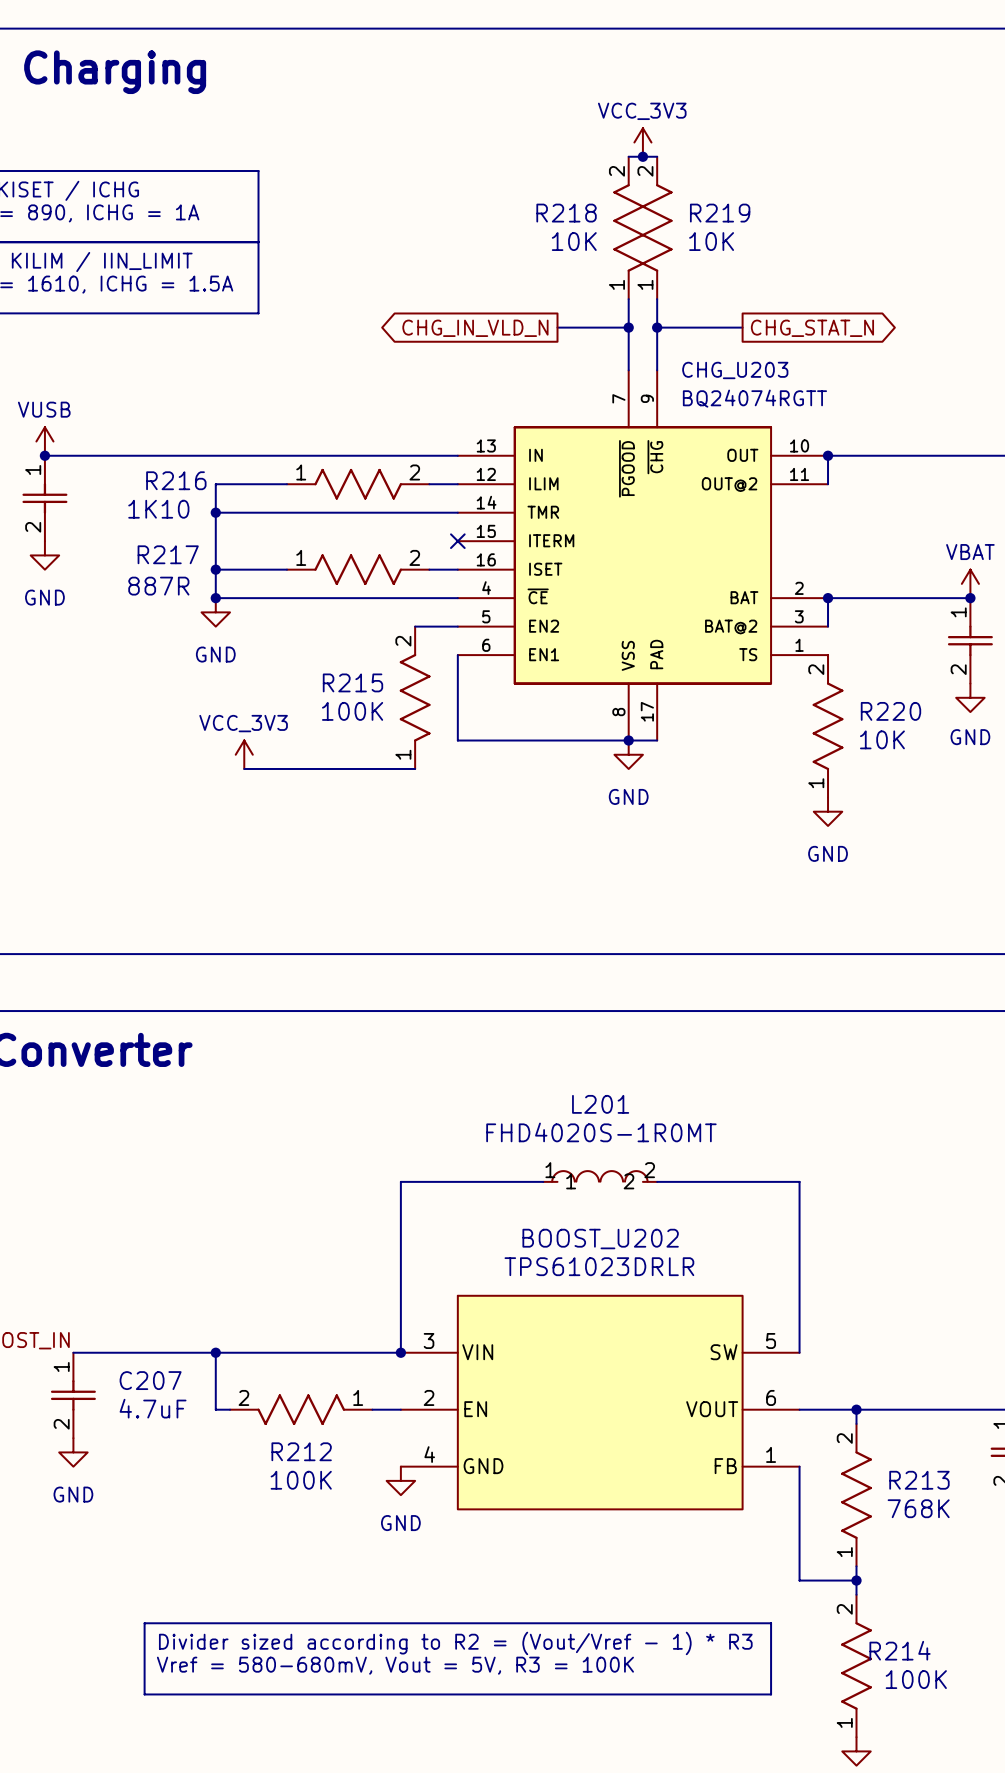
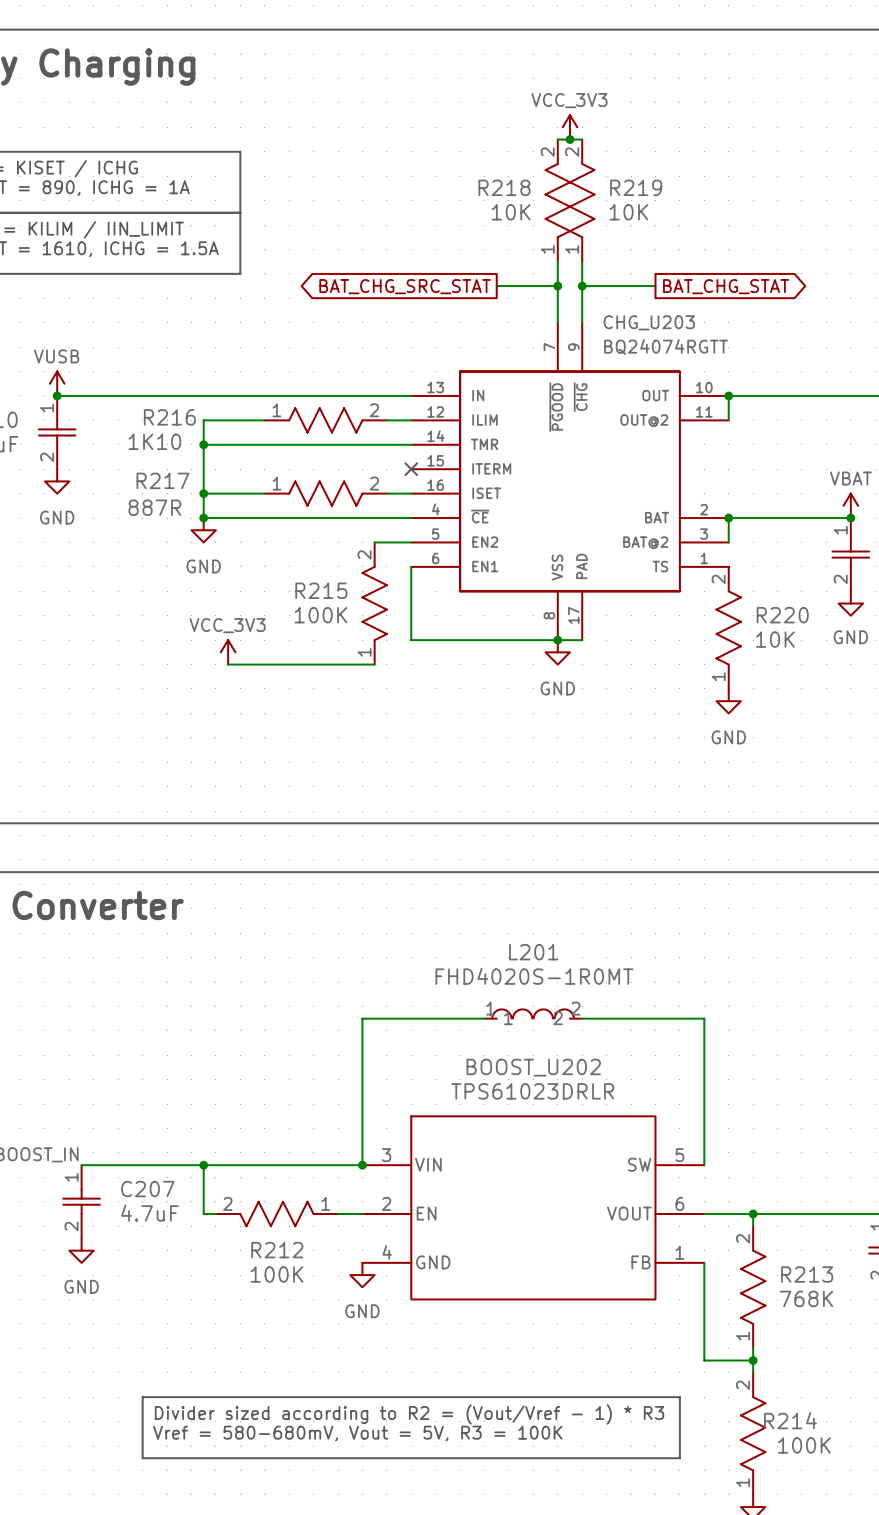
global label: CHG_IN_VLD_N (475, 328) -> BAT_CHG_SRC_STAT (405, 286)
global label: CHG_STAT_N (812, 328) -> BAT_CHG_STAT (726, 286)

